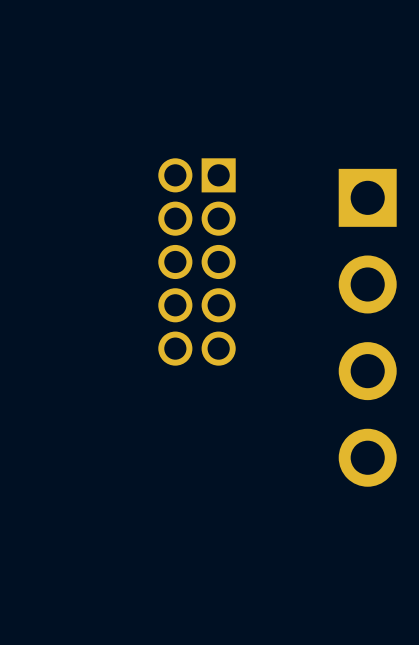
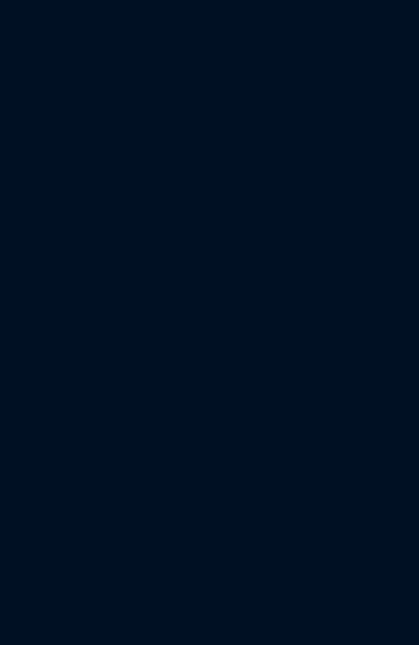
part: (197, 261) -> none
part: (367, 327) -> none

